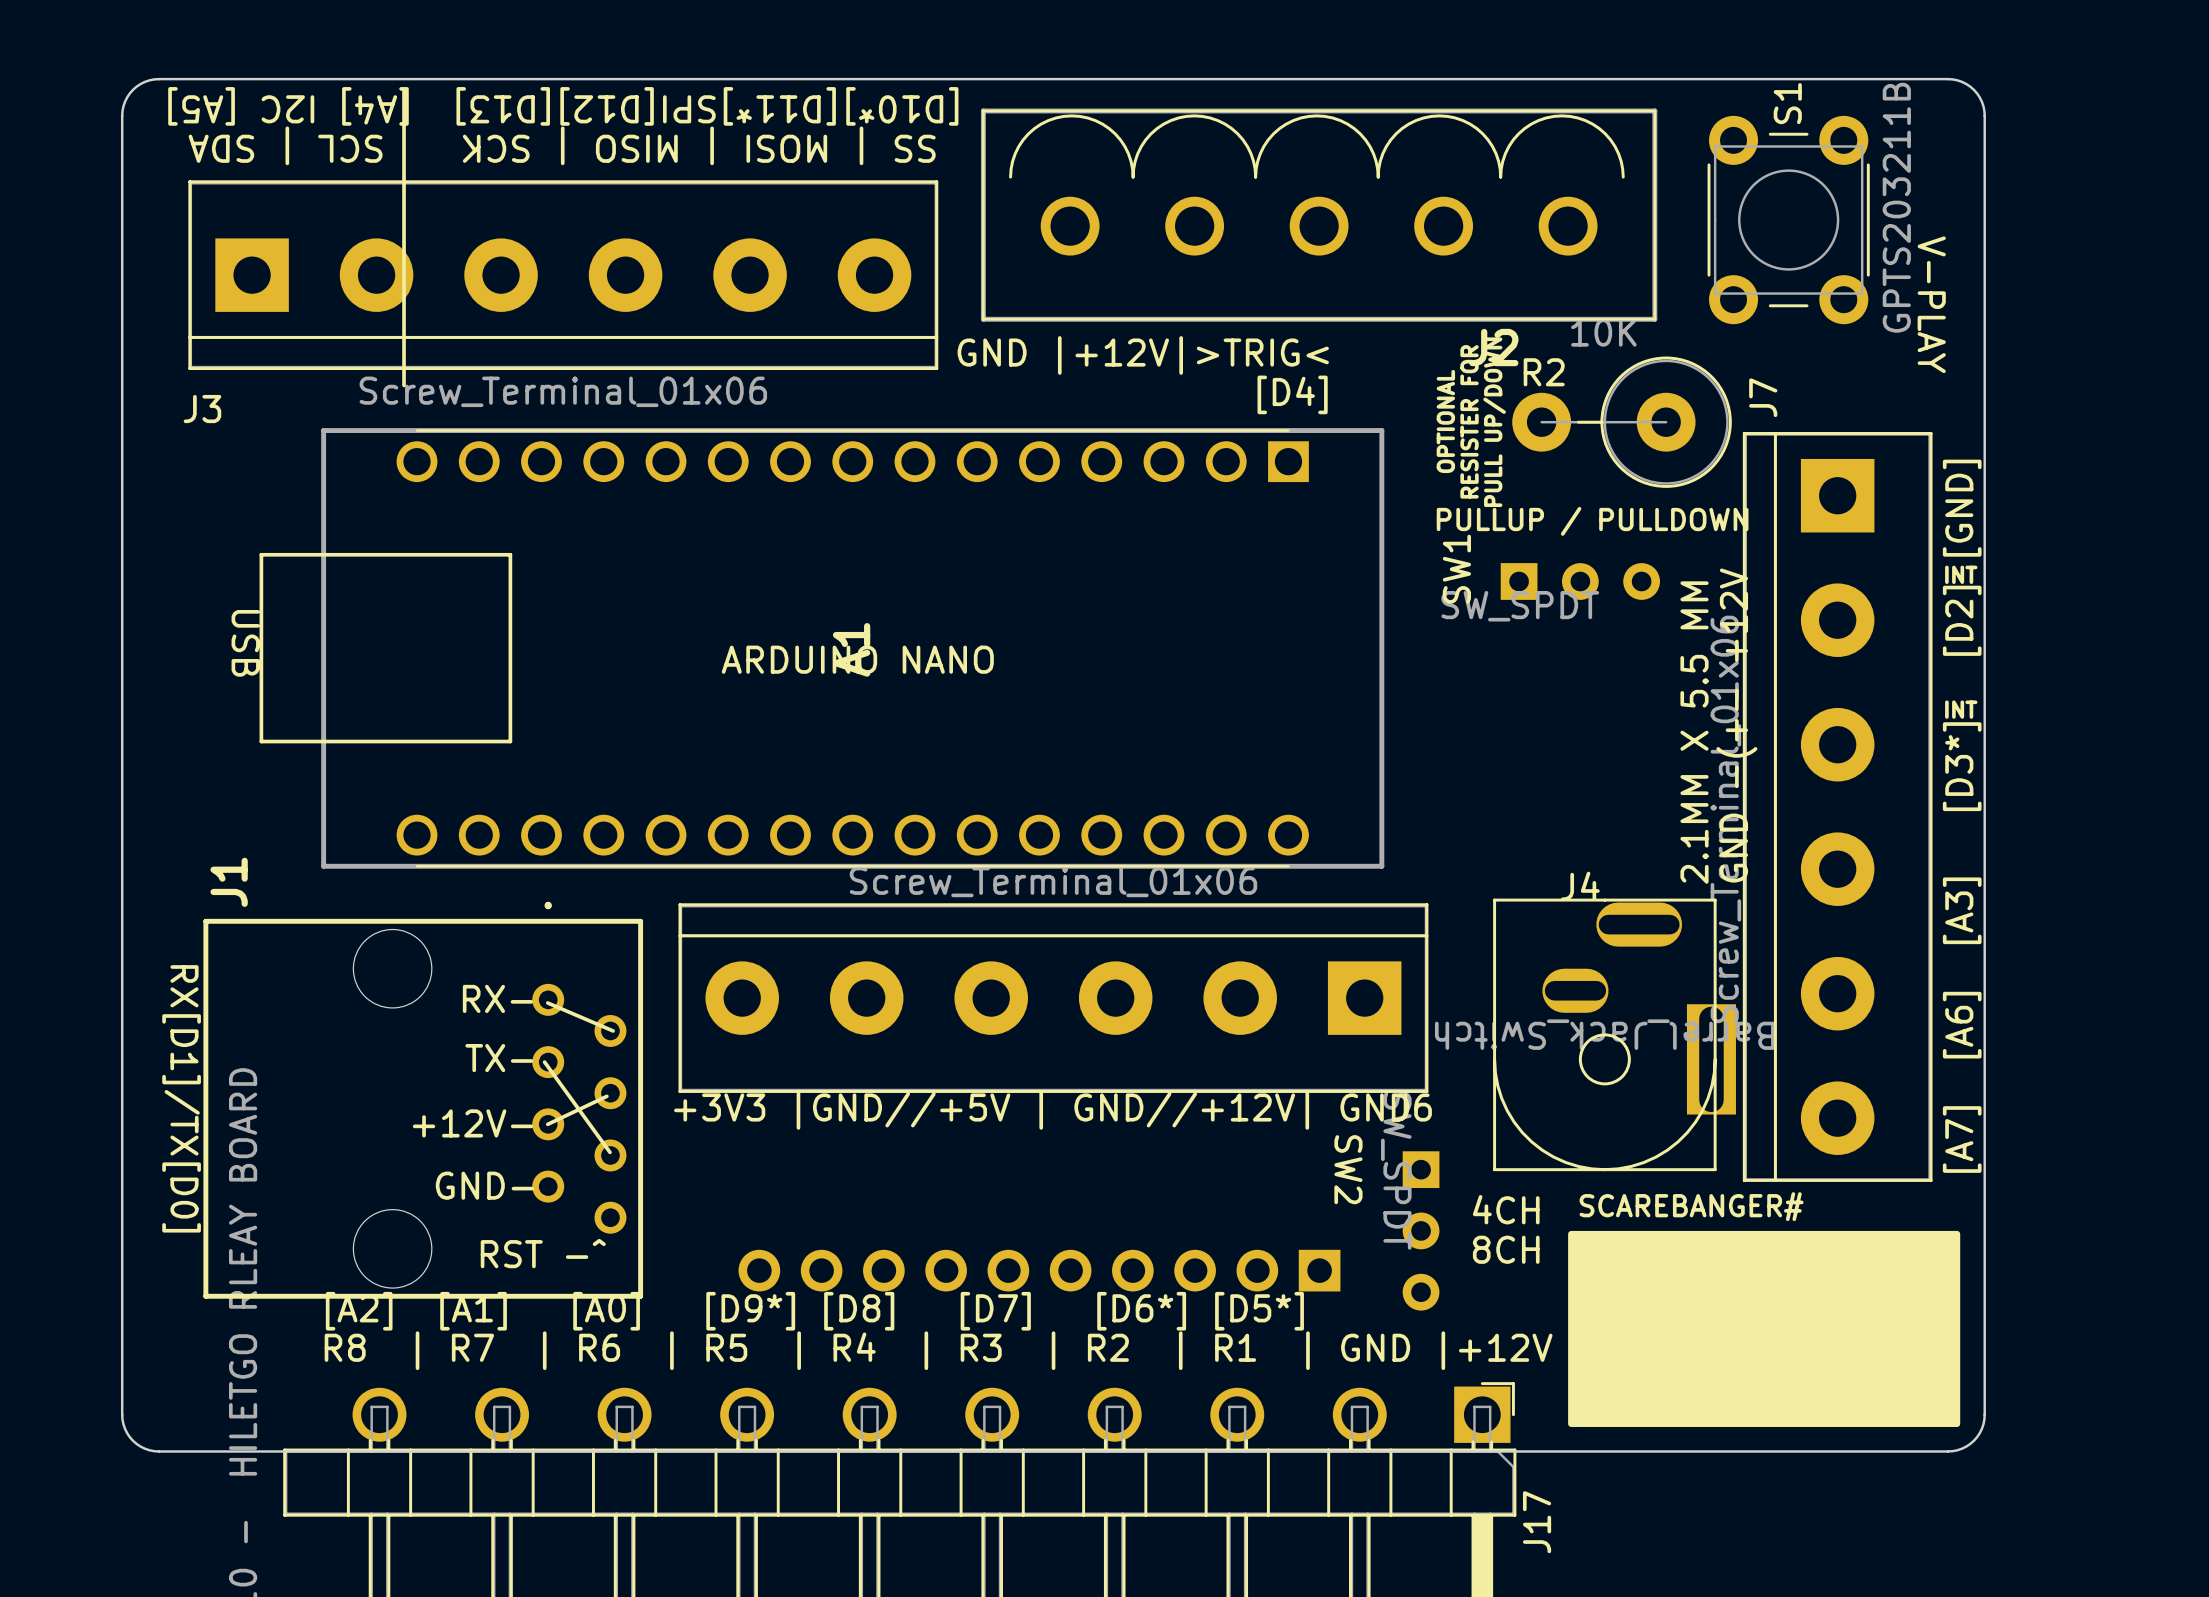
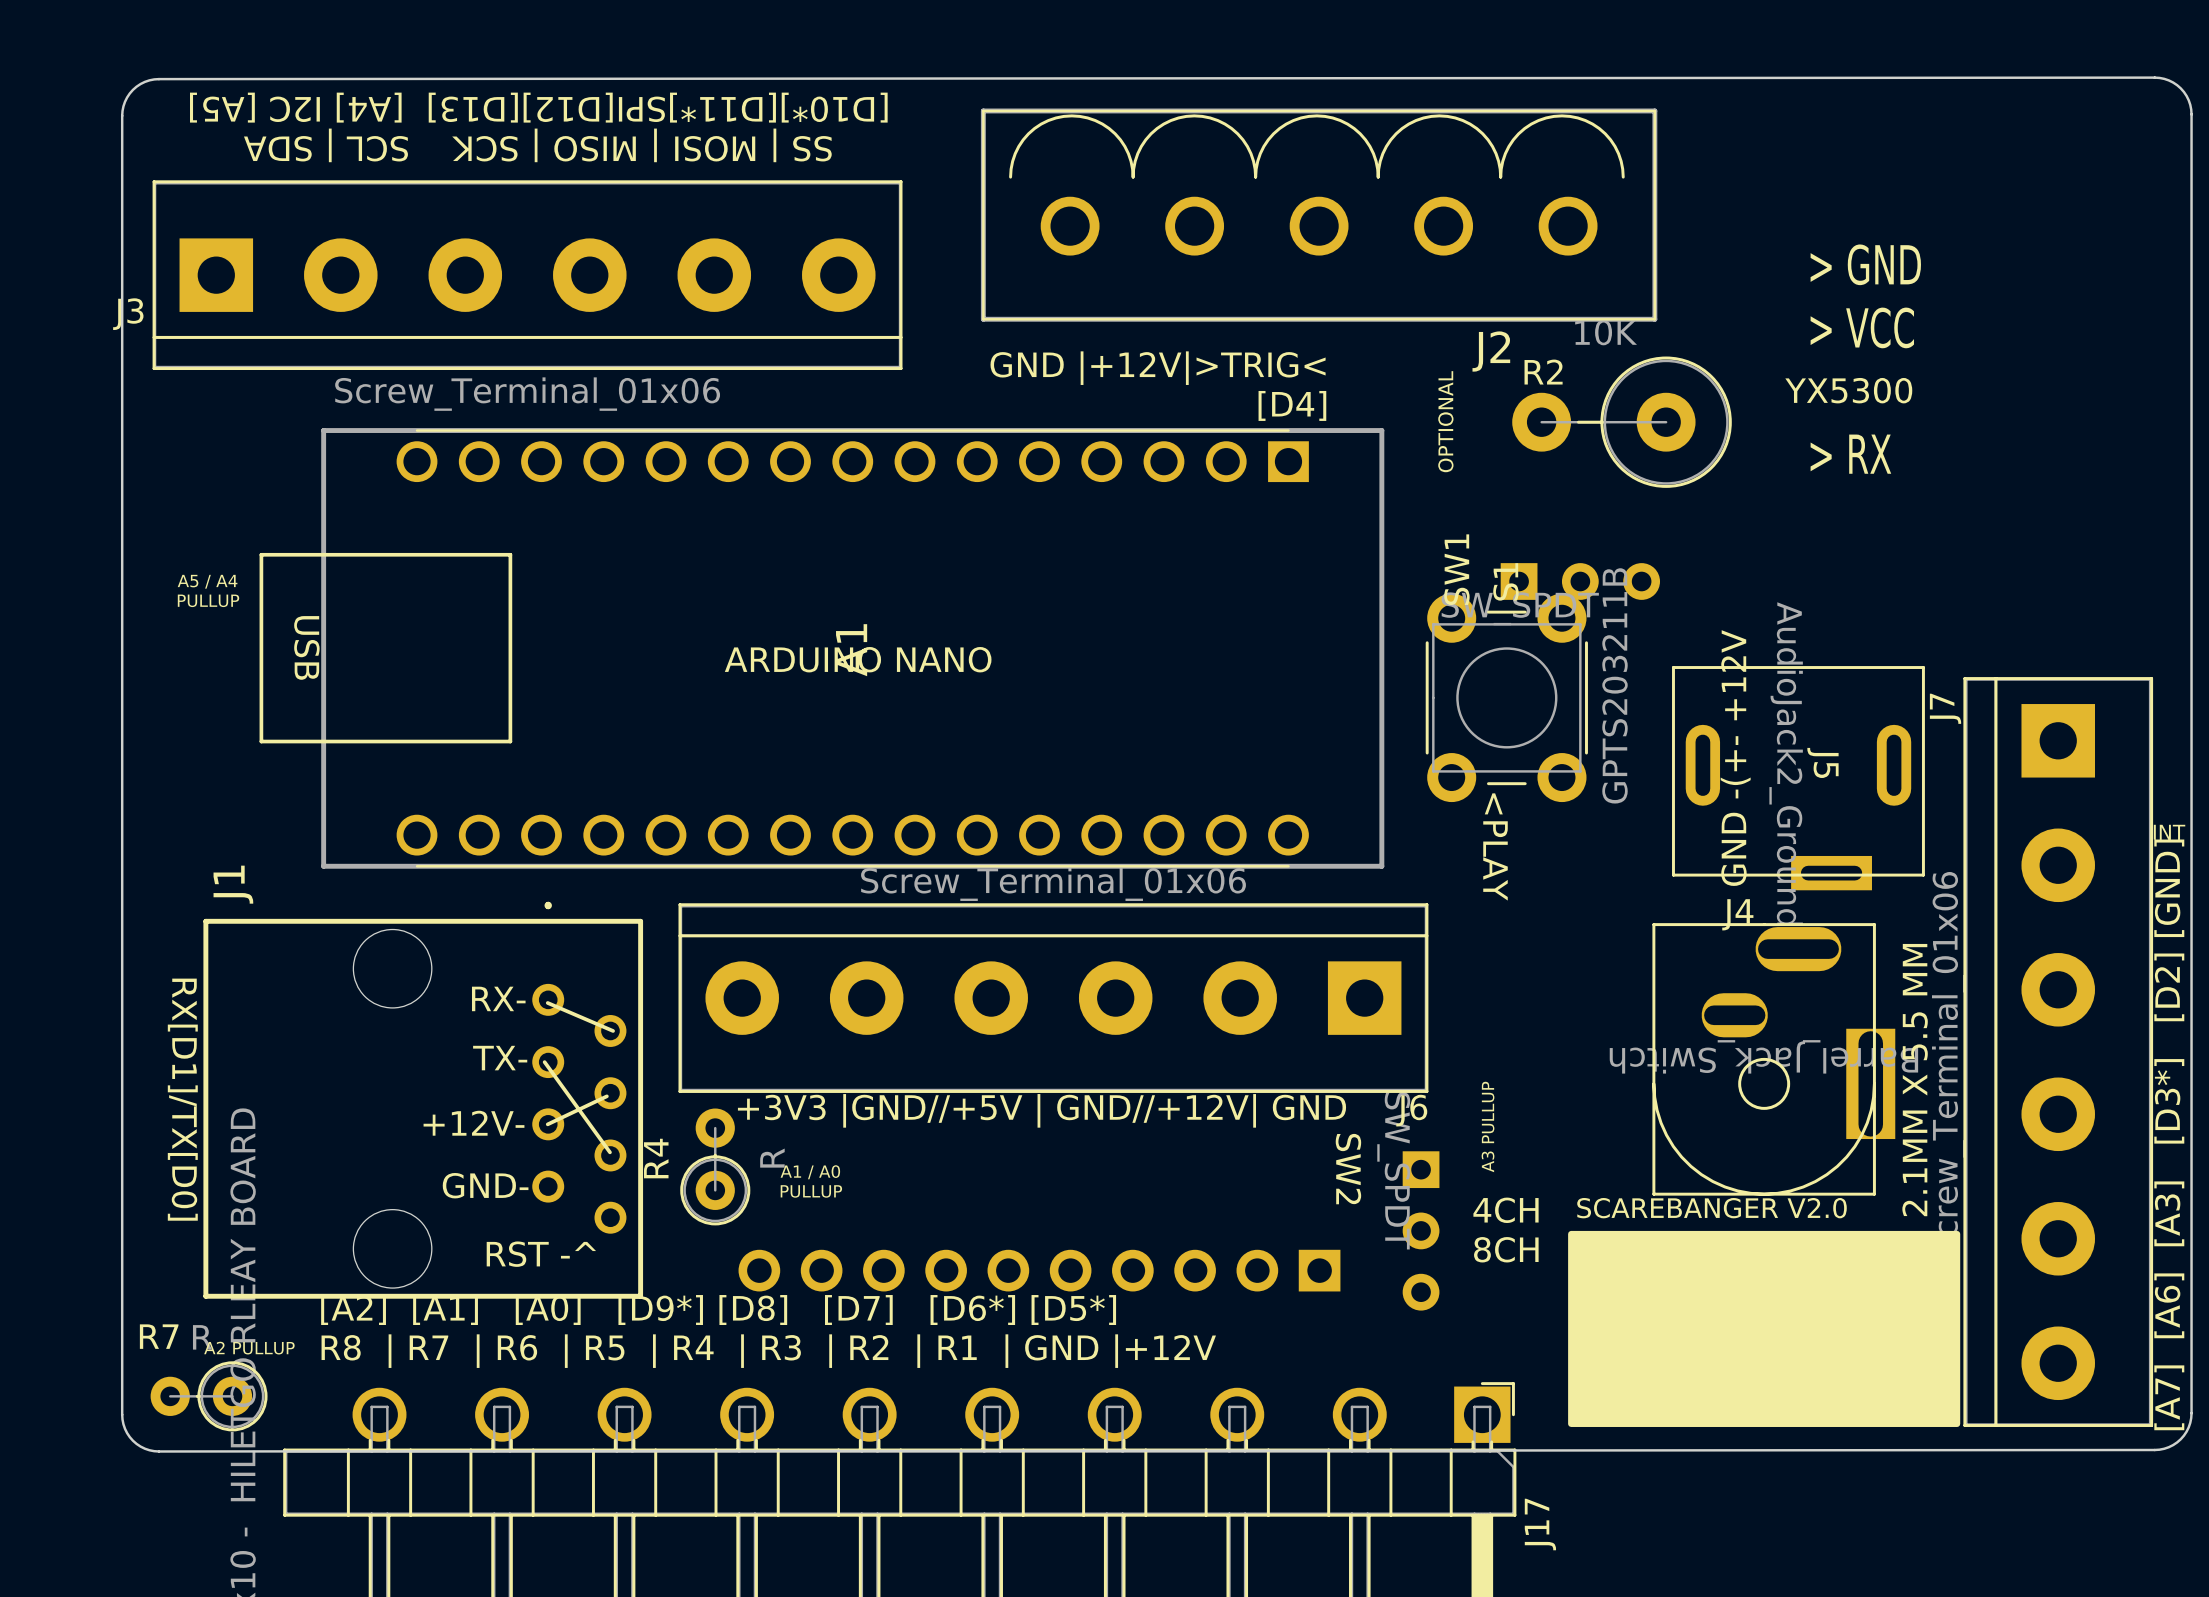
board edge: (158, 79) (1947, 79) (1962, 81) (1973, 89) (1981, 101) (1984, 115) (1984, 1414) (1981, 1428) (1970, 1443) (1957, 1450) (1947, 1451) (158, 1451) -> (158, 79) (2154, 77) (2168, 80) (2180, 88) (2188, 100) (2191, 114) (2191, 1413) (2186, 1431) (2173, 1445) (2154, 1450) (158, 1451)
line: (404, 91) (404, 385) -> none
text position: [D10*][D11*]SPI[D12][D13] [A4] I2C [A5] (563, 106) -> [D10*][D11*]SPI[D12][D13] [A4] I2C [A5] (538, 107)
text position: SS | MOSI | MISO | SCK SCL | SDA (562, 145) -> SS | MOSI | MISO | SCK SCL | SDA (537, 145)
S1 position: (1788, 220) -> (1506, 697)
text: none -> > GND (1865, 264)
J3 position: (563, 275) -> (527, 275)
text: V-PLAY (1931, 304) -> none
text: none -> > VCC (1862, 327)
text position: GND |+12V|>TRIG< (1143, 355) -> GND |+12V|>TRIG< (1158, 368)
text: none -> YX5300 (1848, 390)
text position: [D4] (1292, 394) -> [D4] (1292, 405)
J7 name position: J7 (1763, 397) -> J7 (1945, 708)
J3 name position: J3 (202, 409) -> J3 (128, 314)
text: RESISTER FOR (1469, 421) -> none
text: PULL UP/DOWN (1494, 422) -> none
text: none -> > RX (1850, 454)
text: PULLUP / PULLDOWN (1592, 521) -> none
text: INT (1961, 574) -> none
text: none -> A5 / A4 (207, 581)
text: none -> PULLUP (208, 600)
text position: USB (245, 643) -> USB (306, 647)
text: INT (1961, 709) -> none
text position: 2.1MM X 5.5 MM (1694, 732) -> 2.1MM X 5.5 MM (1915, 1080)
J5: none -> AudioJack2_Ground (1798, 778)
J7 position: (1837, 806) -> (2058, 1052)
text position: [A7] [A6] [A3] [D3*] [D2] [GND] (1962, 816) -> [A7] [A6] [A3] [D3*] [D2] [GND] (2169, 1134)
text: none -> INT (2169, 832)
text: none -> <PLAY (1495, 846)
J4 position: (1614, 1034) -> (1773, 1059)
text: none -> A3 PULLUP (1488, 1126)
R4: none -> R (715, 1166)
text: none -> A1 / A0 (810, 1172)
text: none -> PULLUP (811, 1191)
text: SCAREBANGER# (1691, 1206) -> SCAREBANGER V2.0 (1712, 1208)
text: none -> A2 PULLUP (249, 1348)
R7: none -> R (209, 1396)

